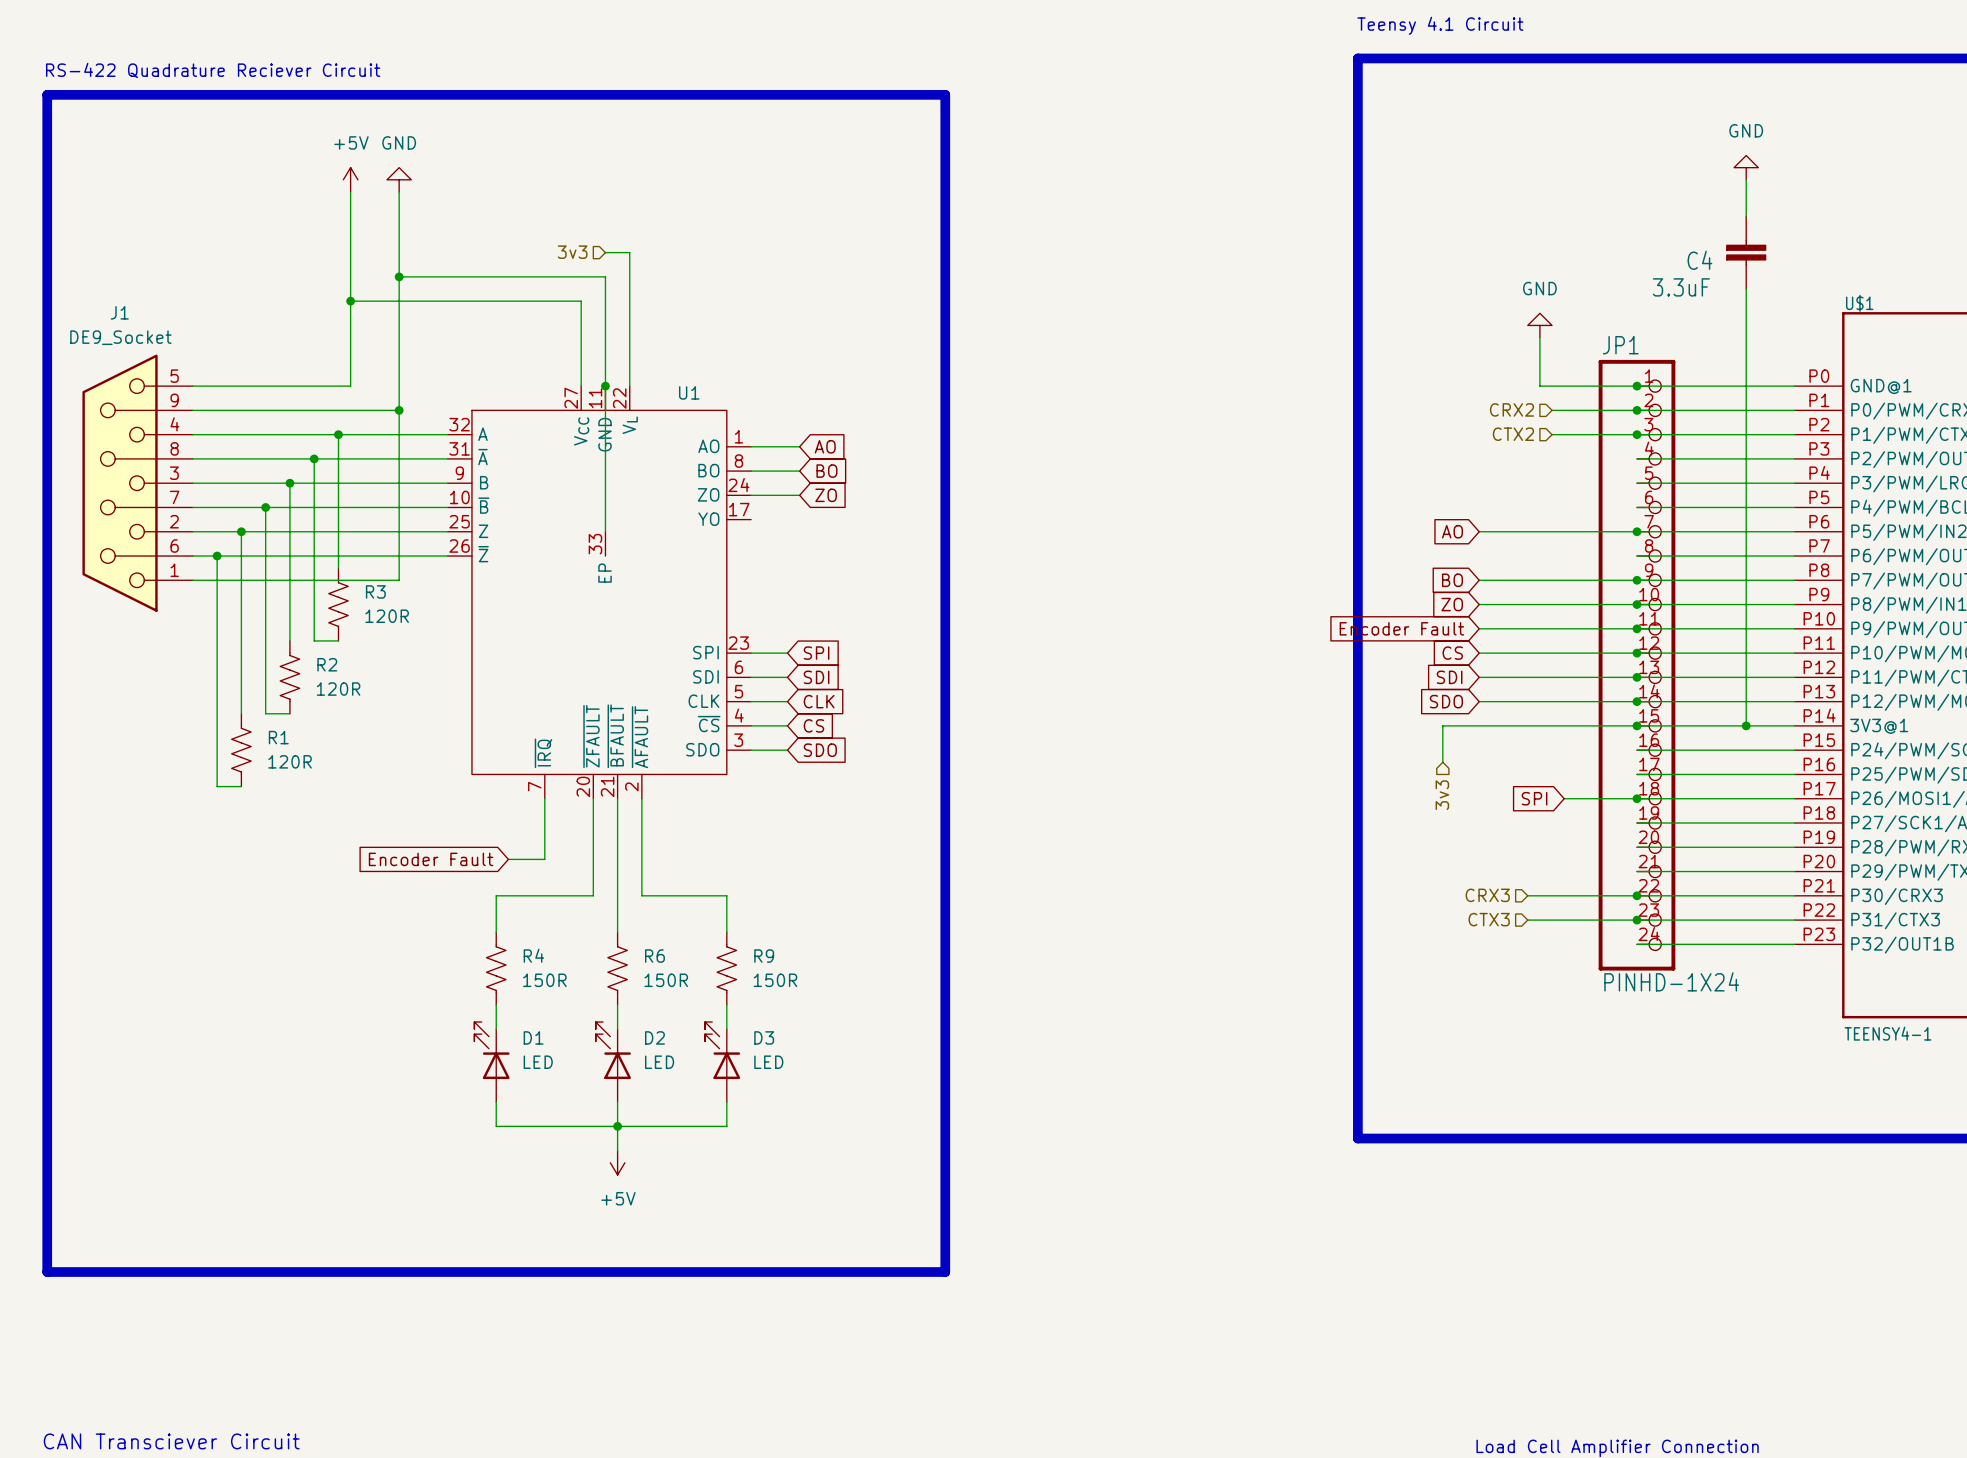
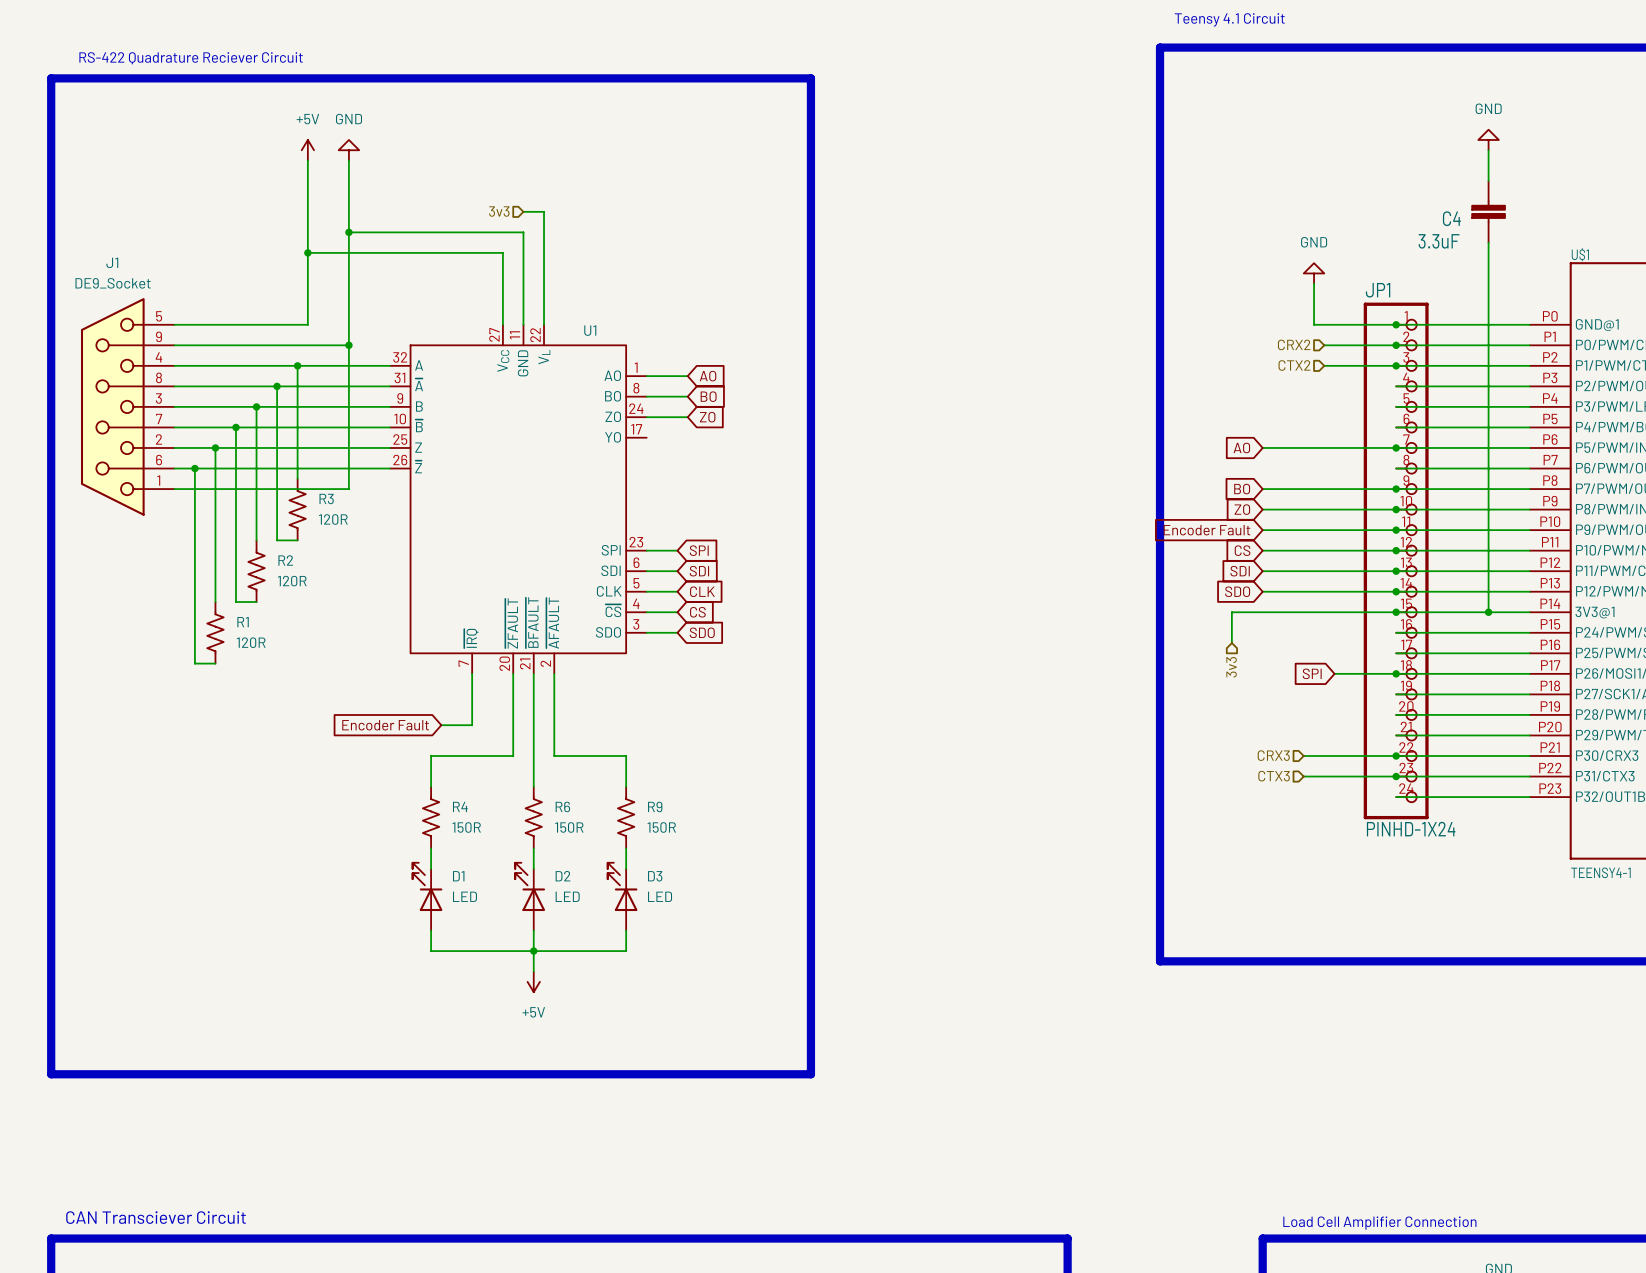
U1 symbol: [447, 386, 752, 799] -> [390, 324, 647, 674]
wire: (605, 386) (605, 531) -> none
junction: (605, 386) -> none

